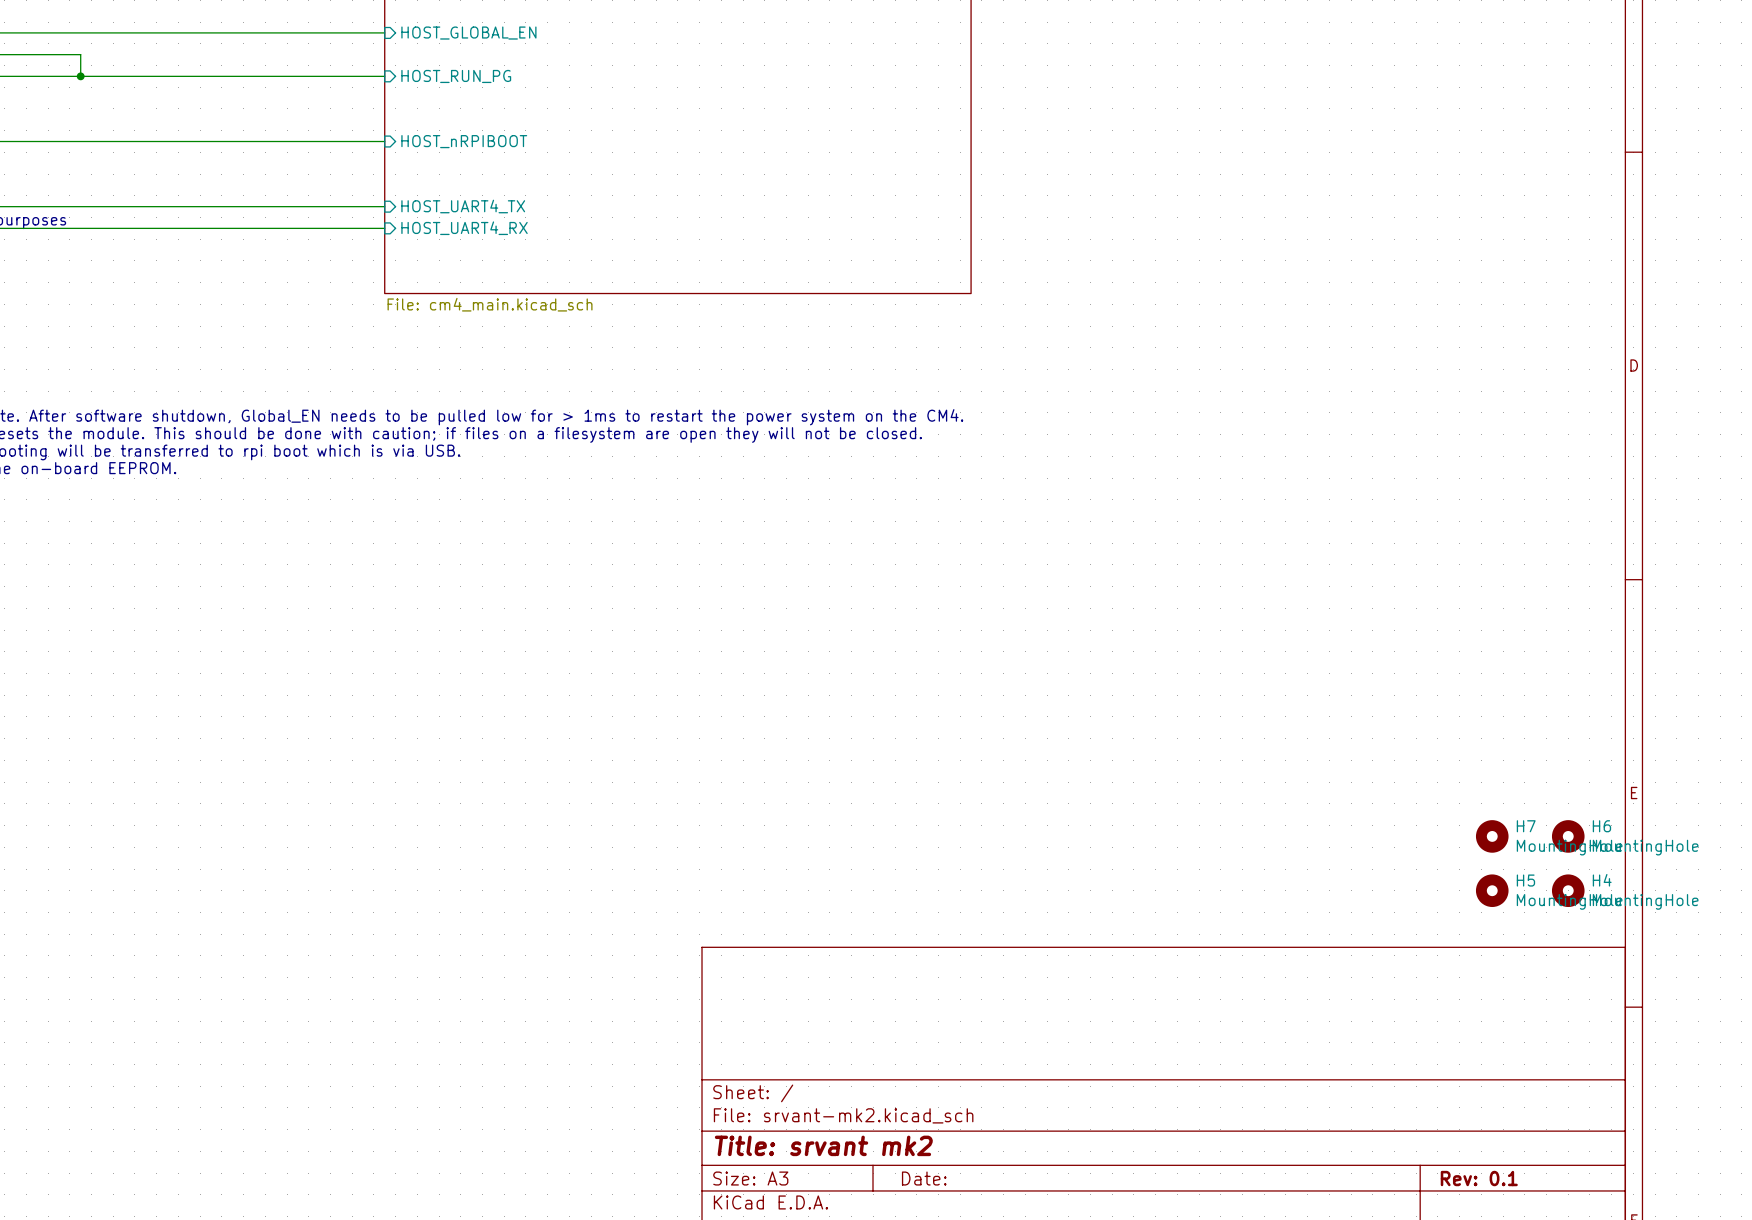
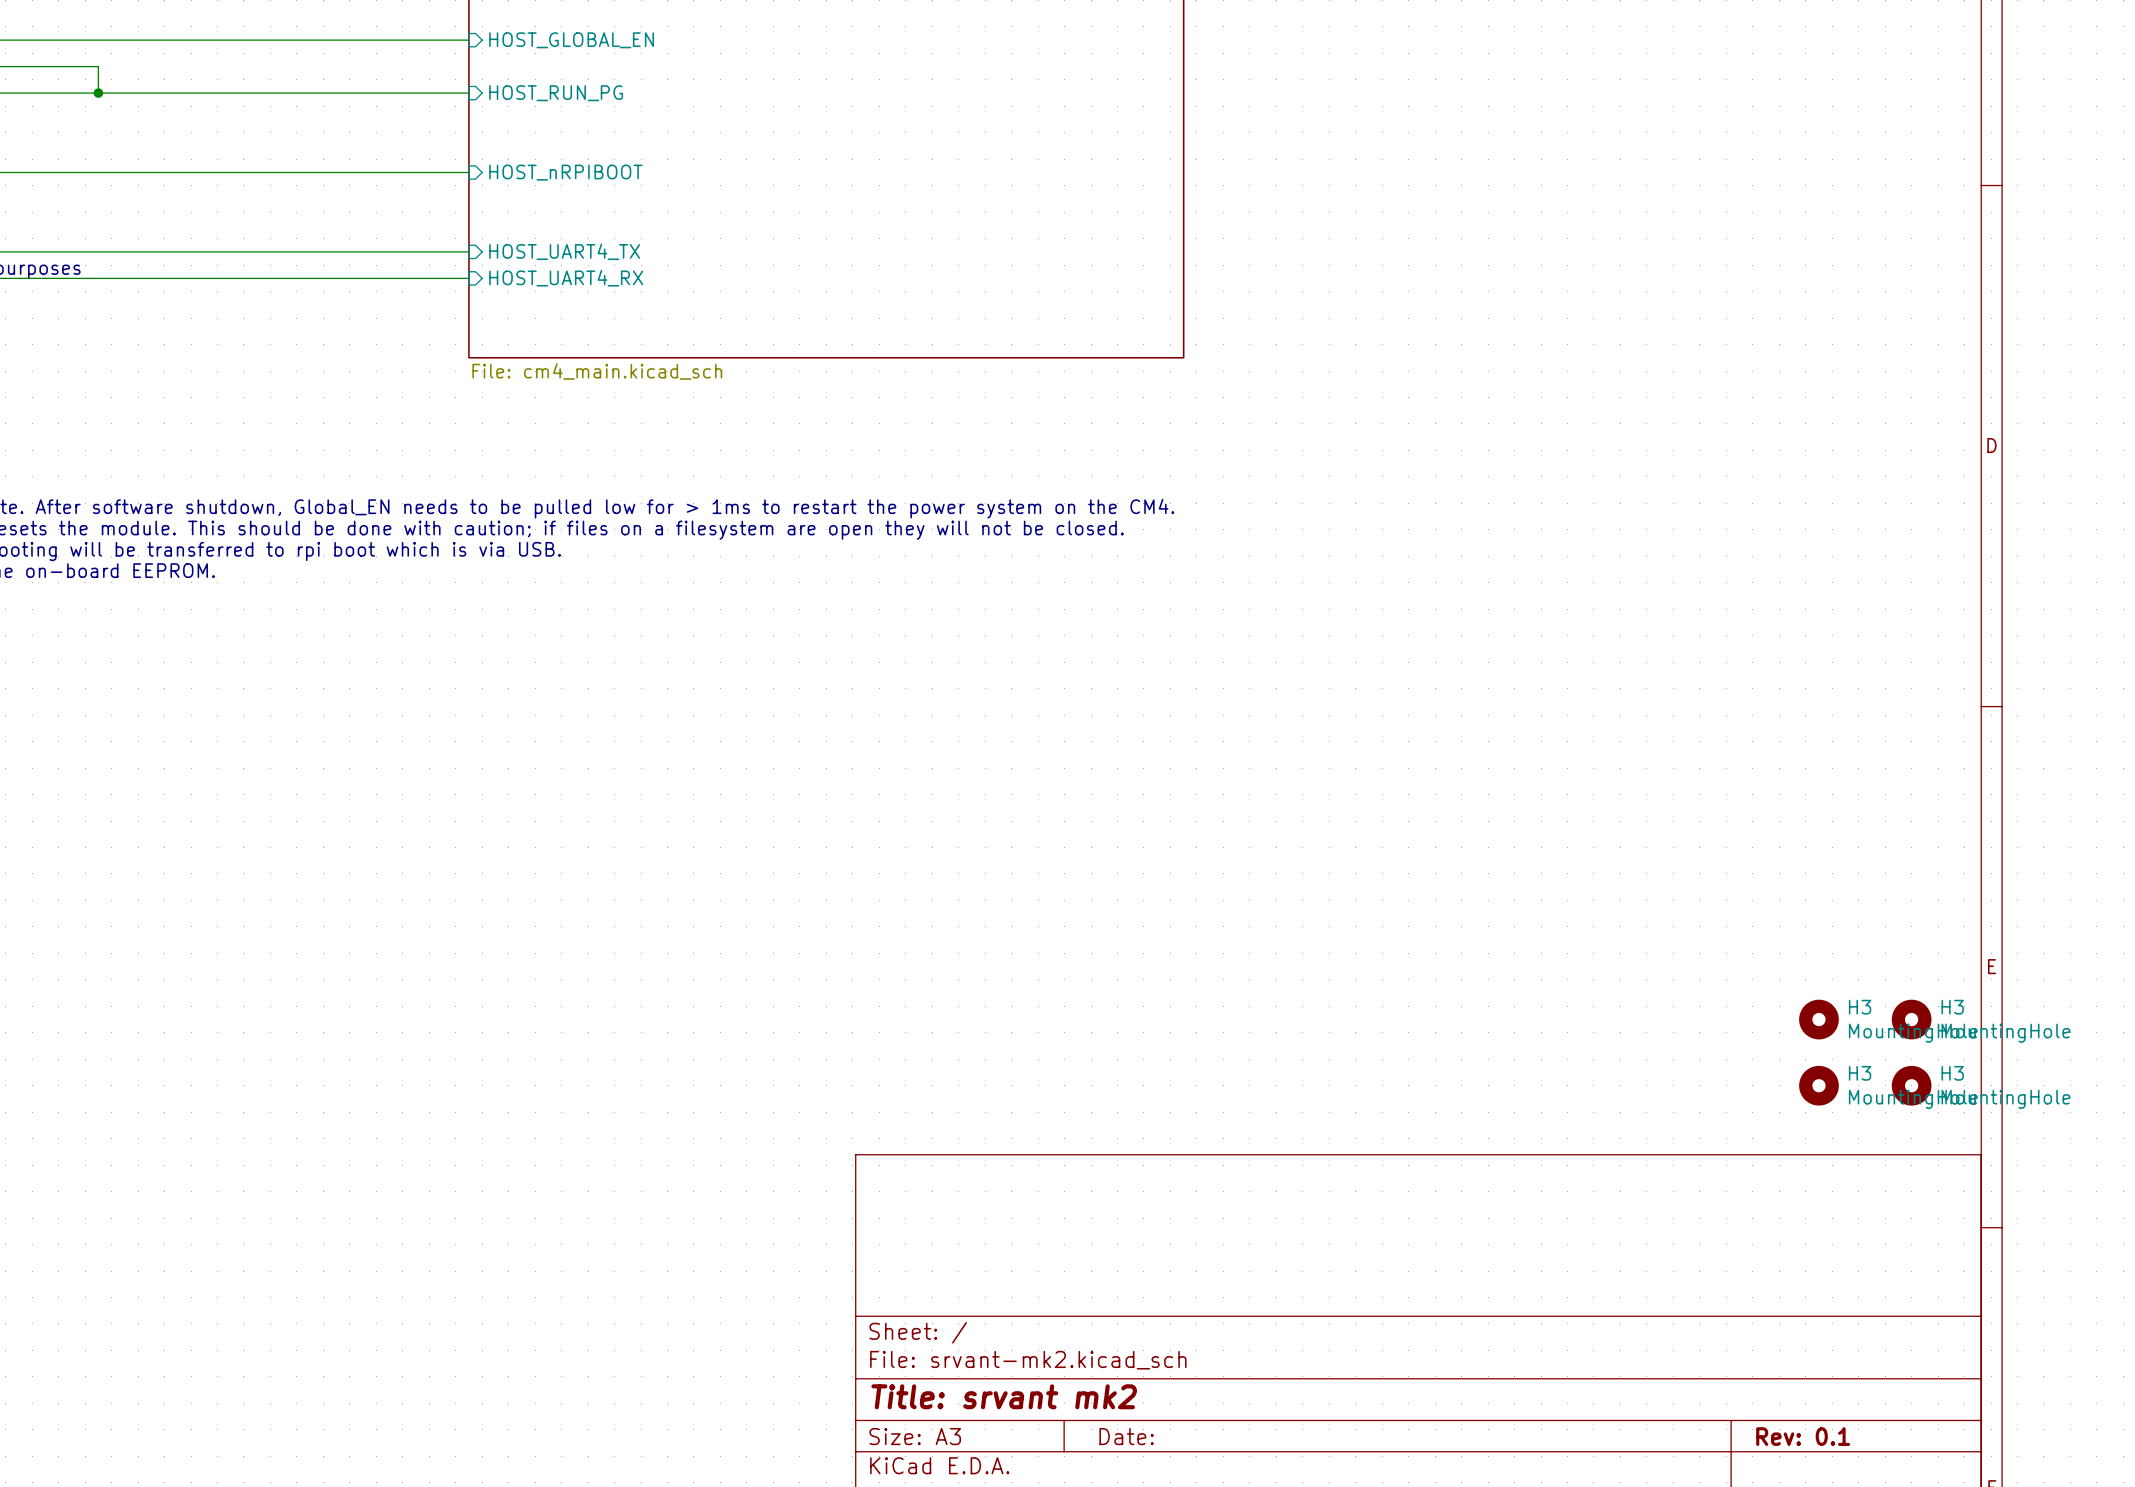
H7 name: H7 (1526, 826) -> H3 (1860, 1007)
H6 name: H6 (1601, 826) -> H3 (1952, 1007)
H5 name: H5 (1525, 880) -> H3 (1860, 1073)
H4 name: H4 (1602, 880) -> H3 (1952, 1073)

